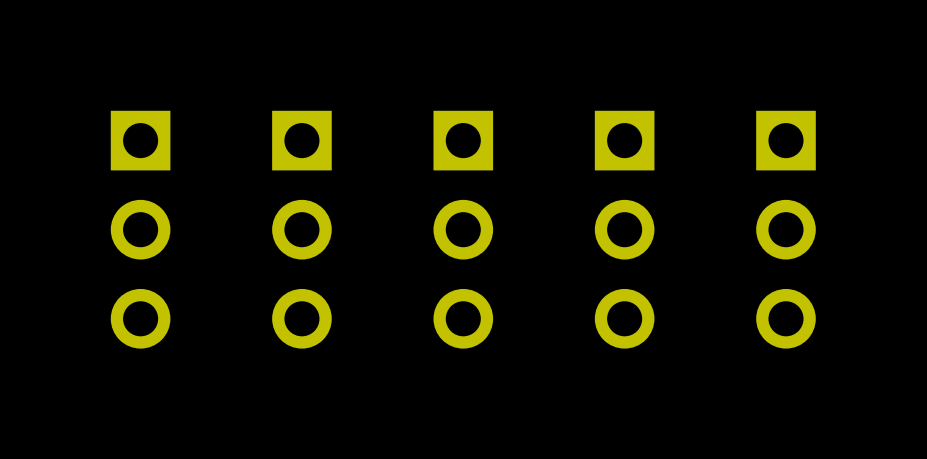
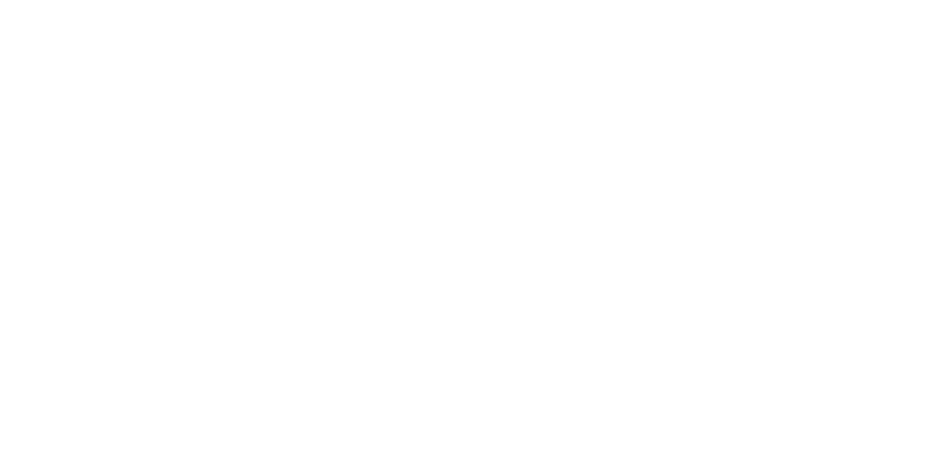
part: (140, 229) -> none
part: (301, 229) -> none
part: (463, 229) -> none
part: (624, 229) -> none
part: (785, 229) -> none

